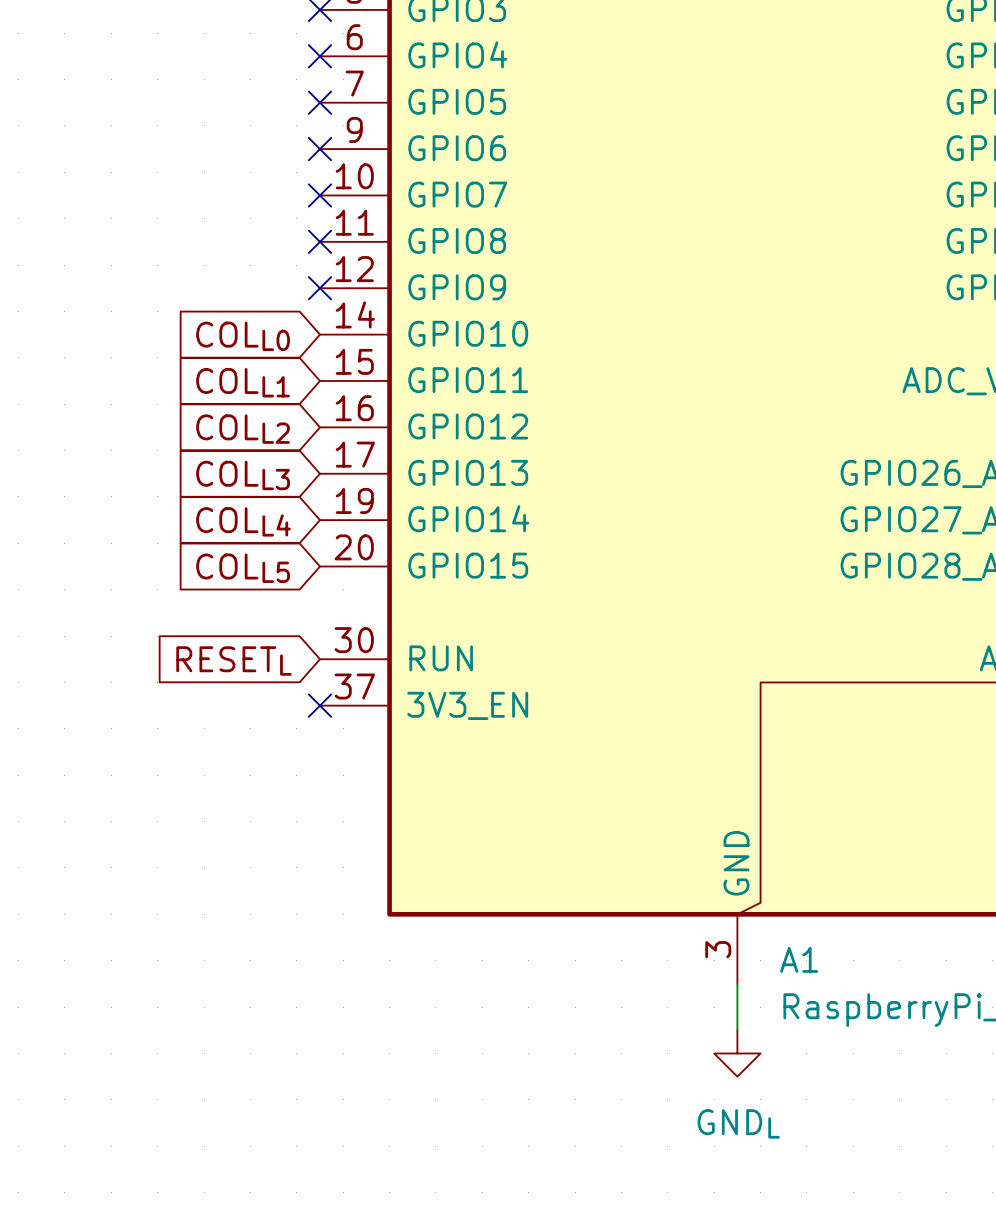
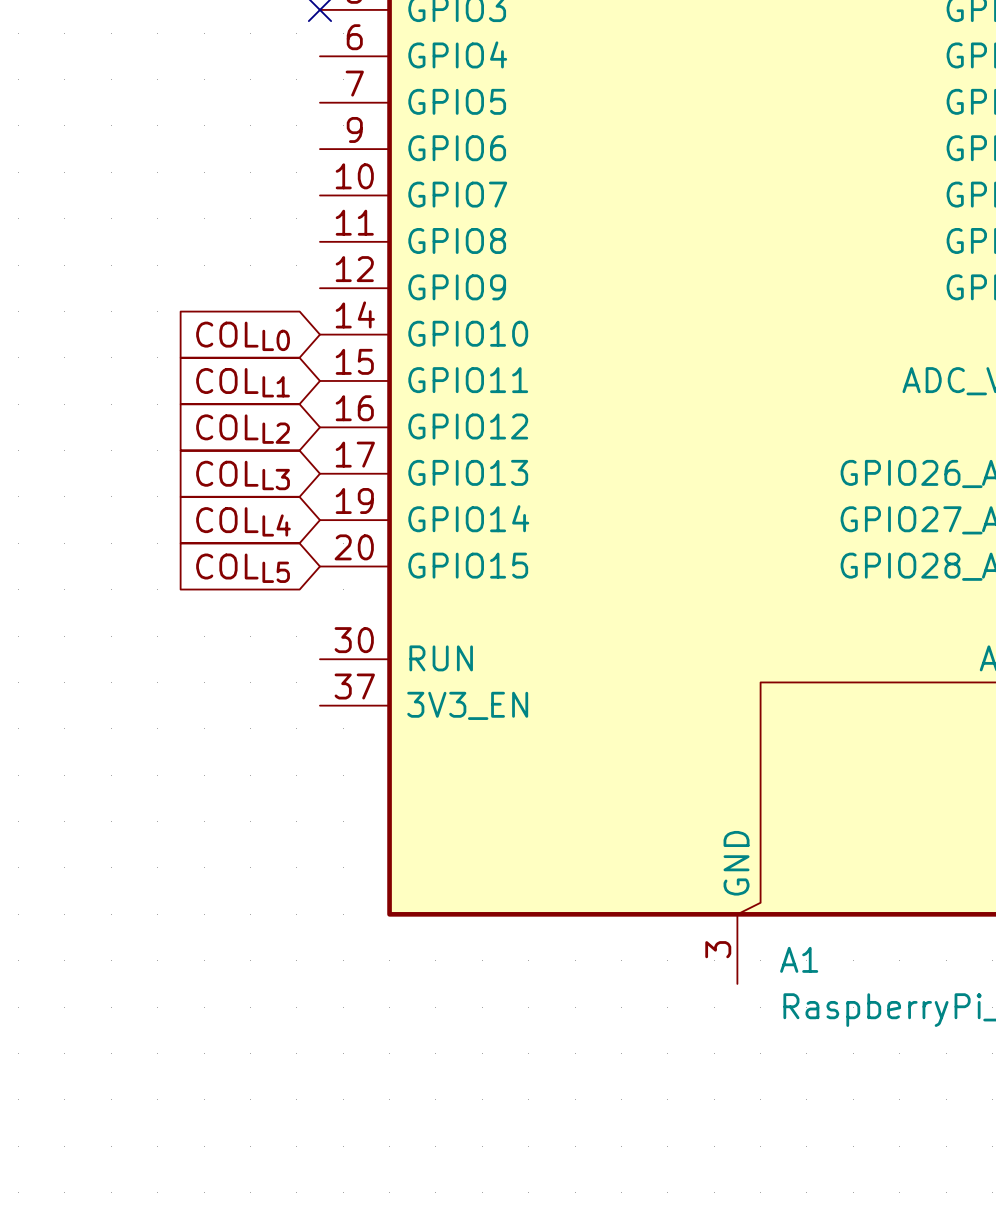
no-connect mark: (319, 56) -> none
no-connect mark: (319, 102) -> none
no-connect mark: (319, 149) -> none
no-connect mark: (319, 195) -> none
no-connect mark: (319, 241) -> none
no-connect mark: (319, 288) -> none
global label: RESETL (233, 661) -> none
no-connect mark: (319, 705) -> none
wire: (737, 983) (737, 1030) -> none
power symbol: GNDL (737, 1053) -> none

